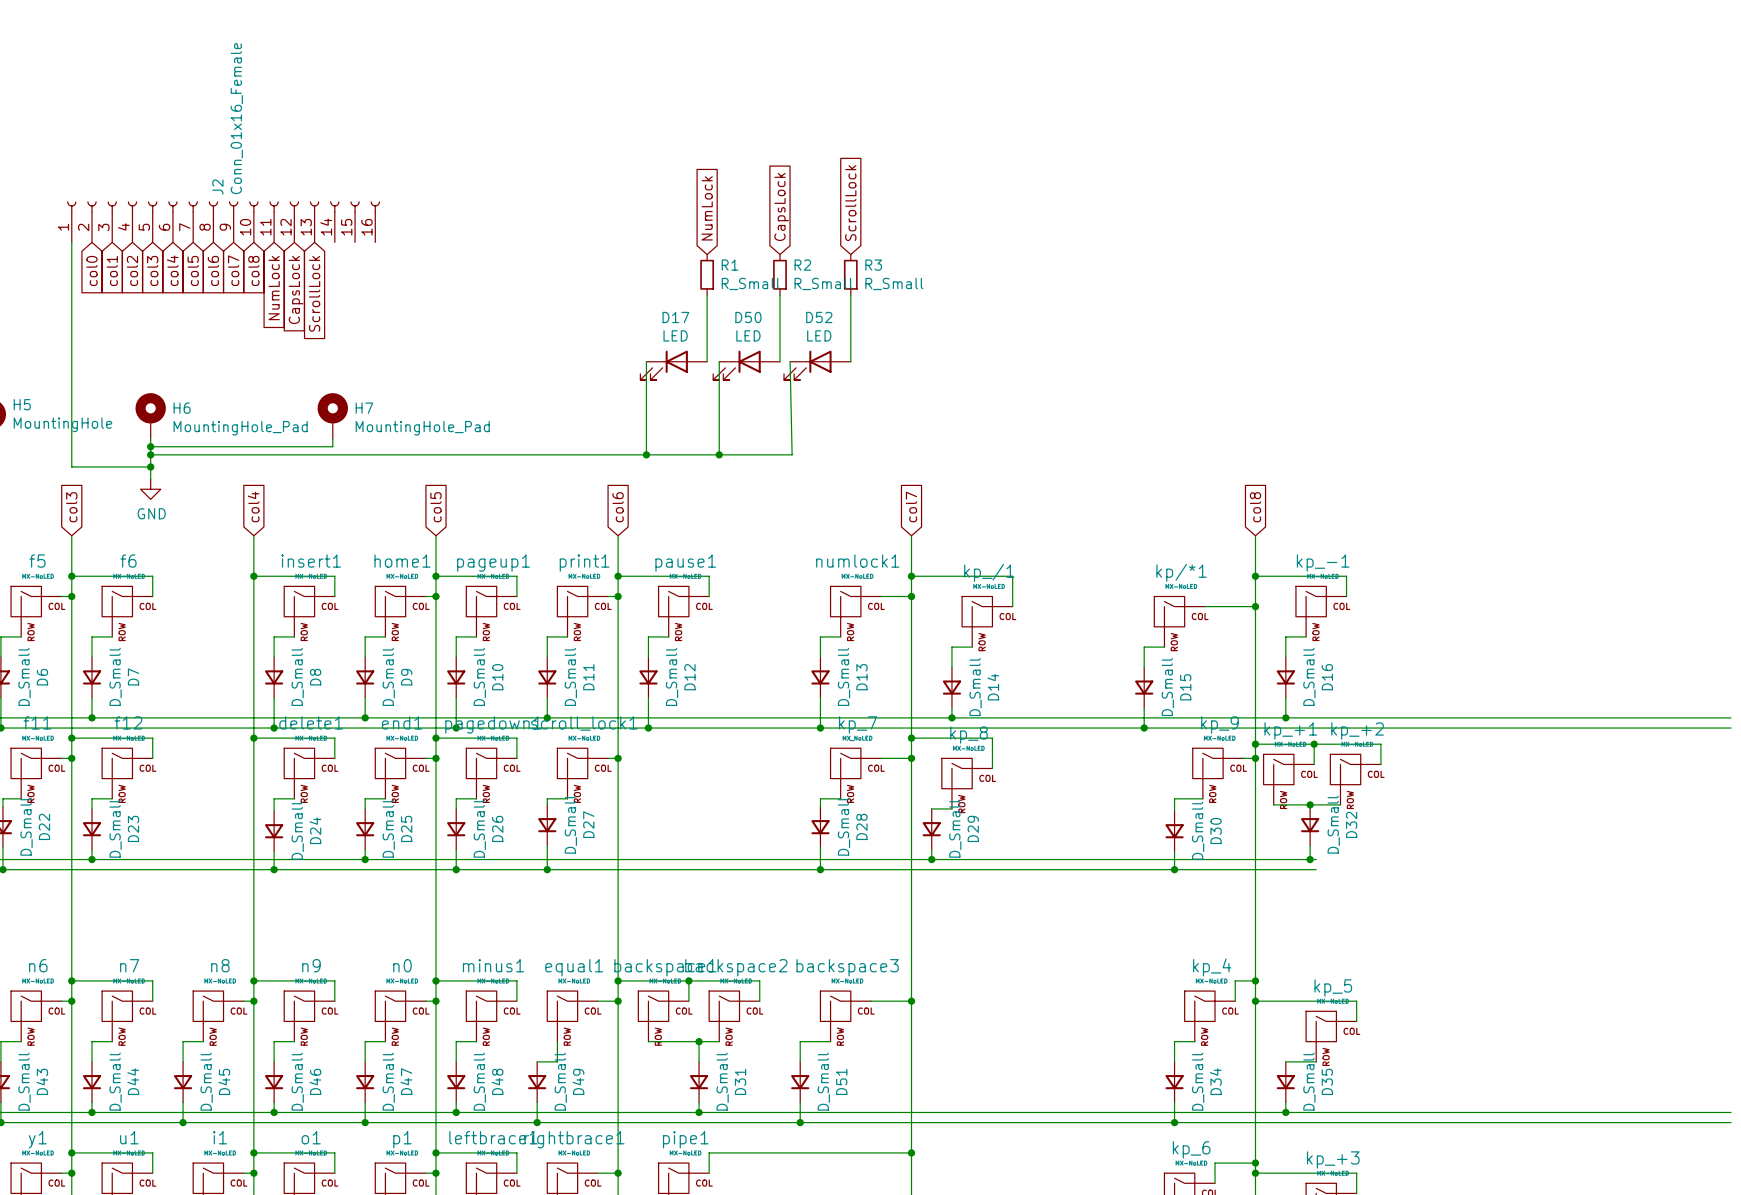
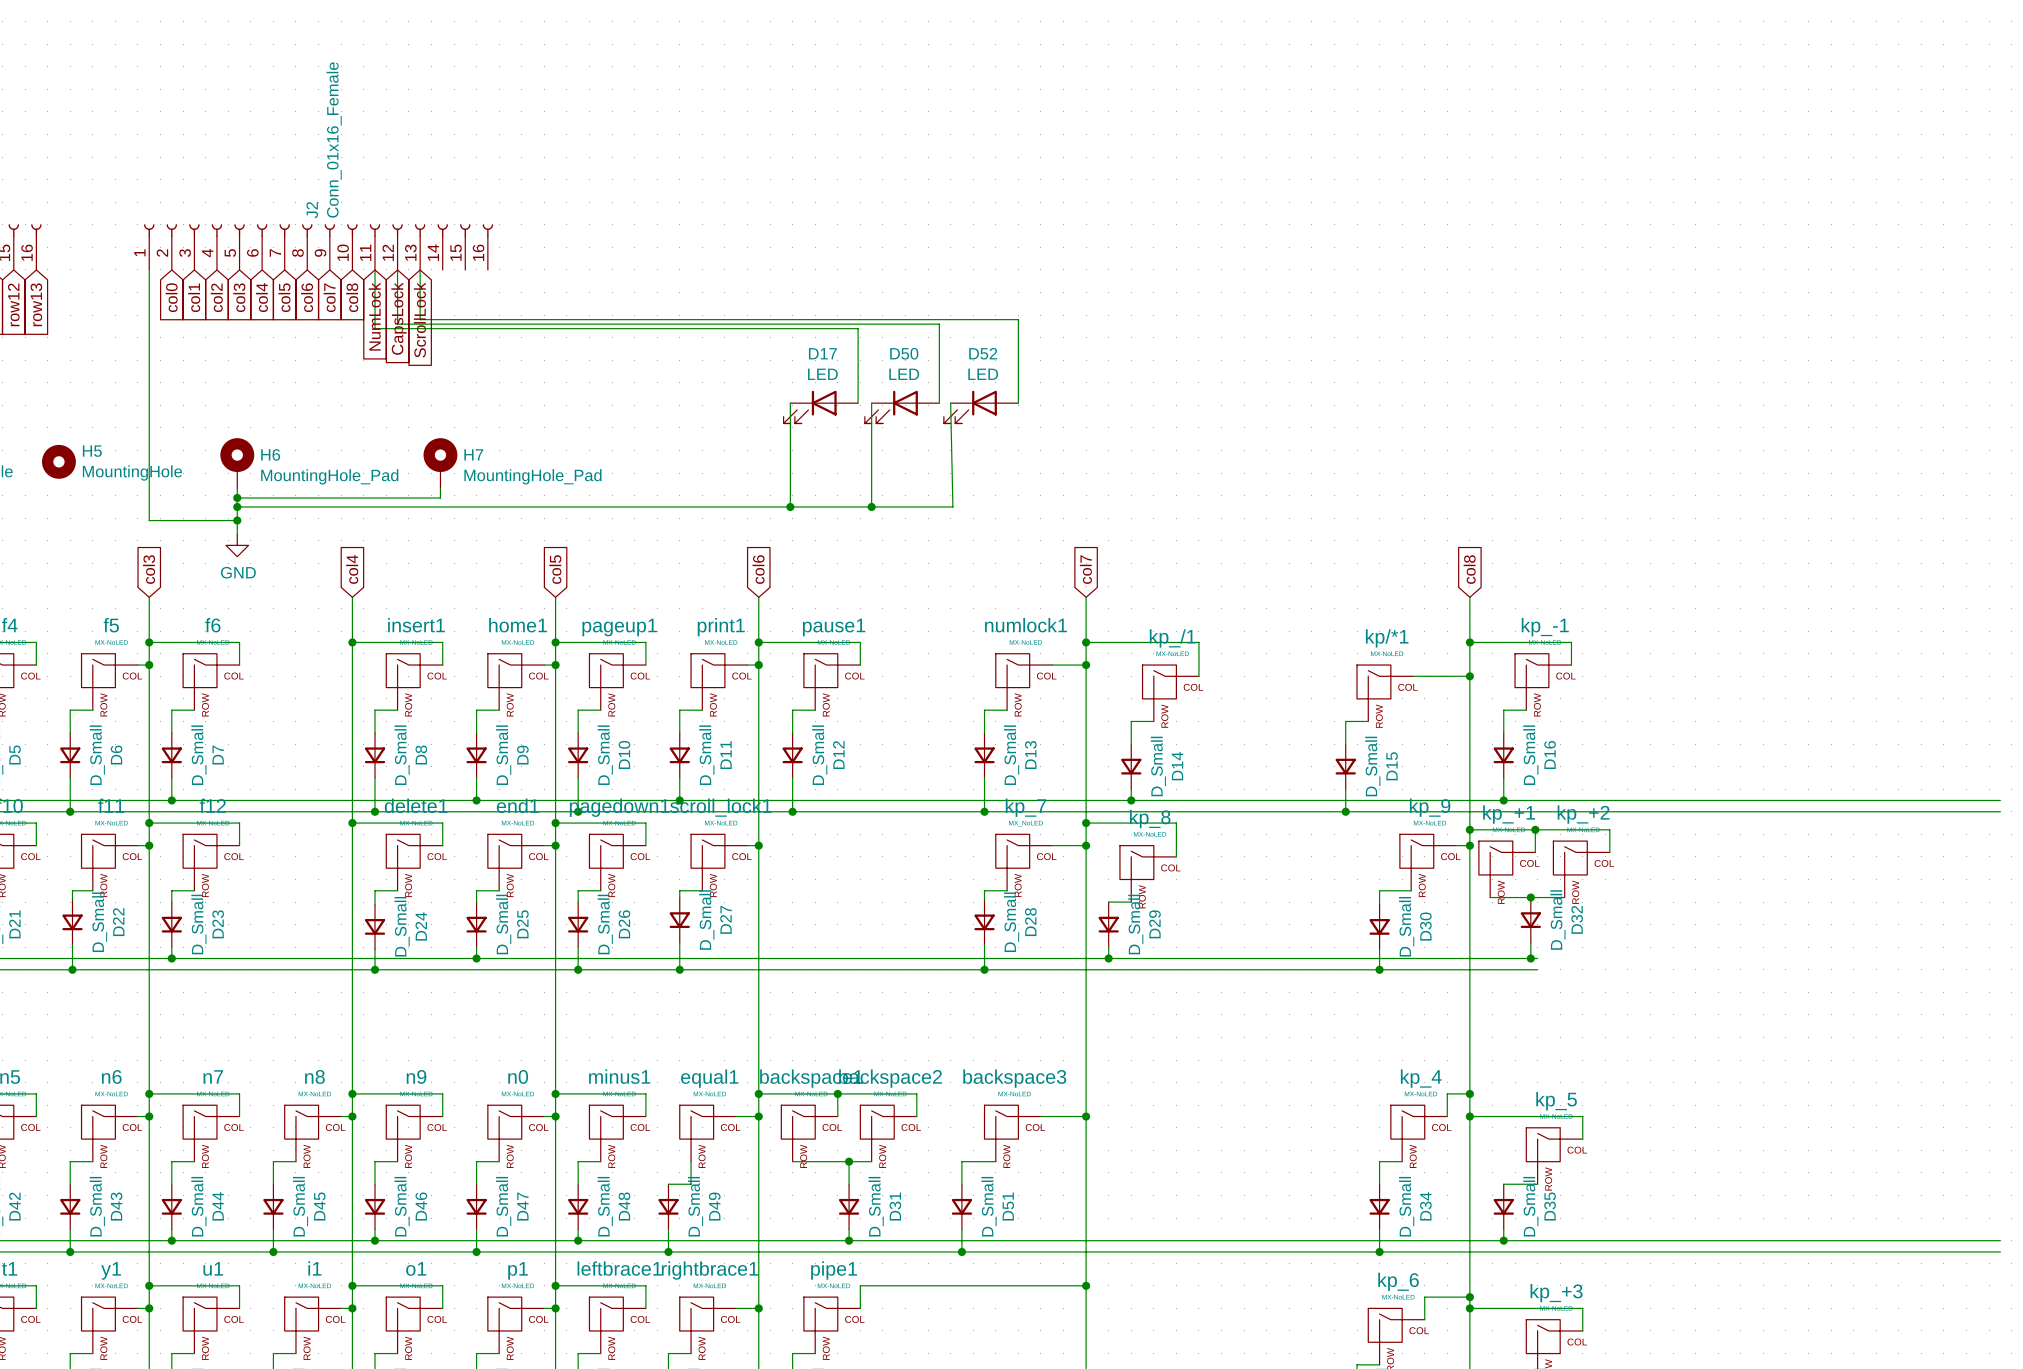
global label: ScrollLock (850, 203) -> none
global label: CapsLock (781, 206) -> none
global label: NumLock (707, 208) -> none
wire: none -> (374, 269) (374, 328) (858, 328)
wire: none -> (397, 269) (397, 324) (939, 324) (939, 328)
wire: none -> (420, 269) (420, 319) (1018, 319) (1018, 328)
R1: R_Small (707, 274) -> none
R2: R_Small (779, 274) -> none
R3: R_Small (850, 274) -> none

